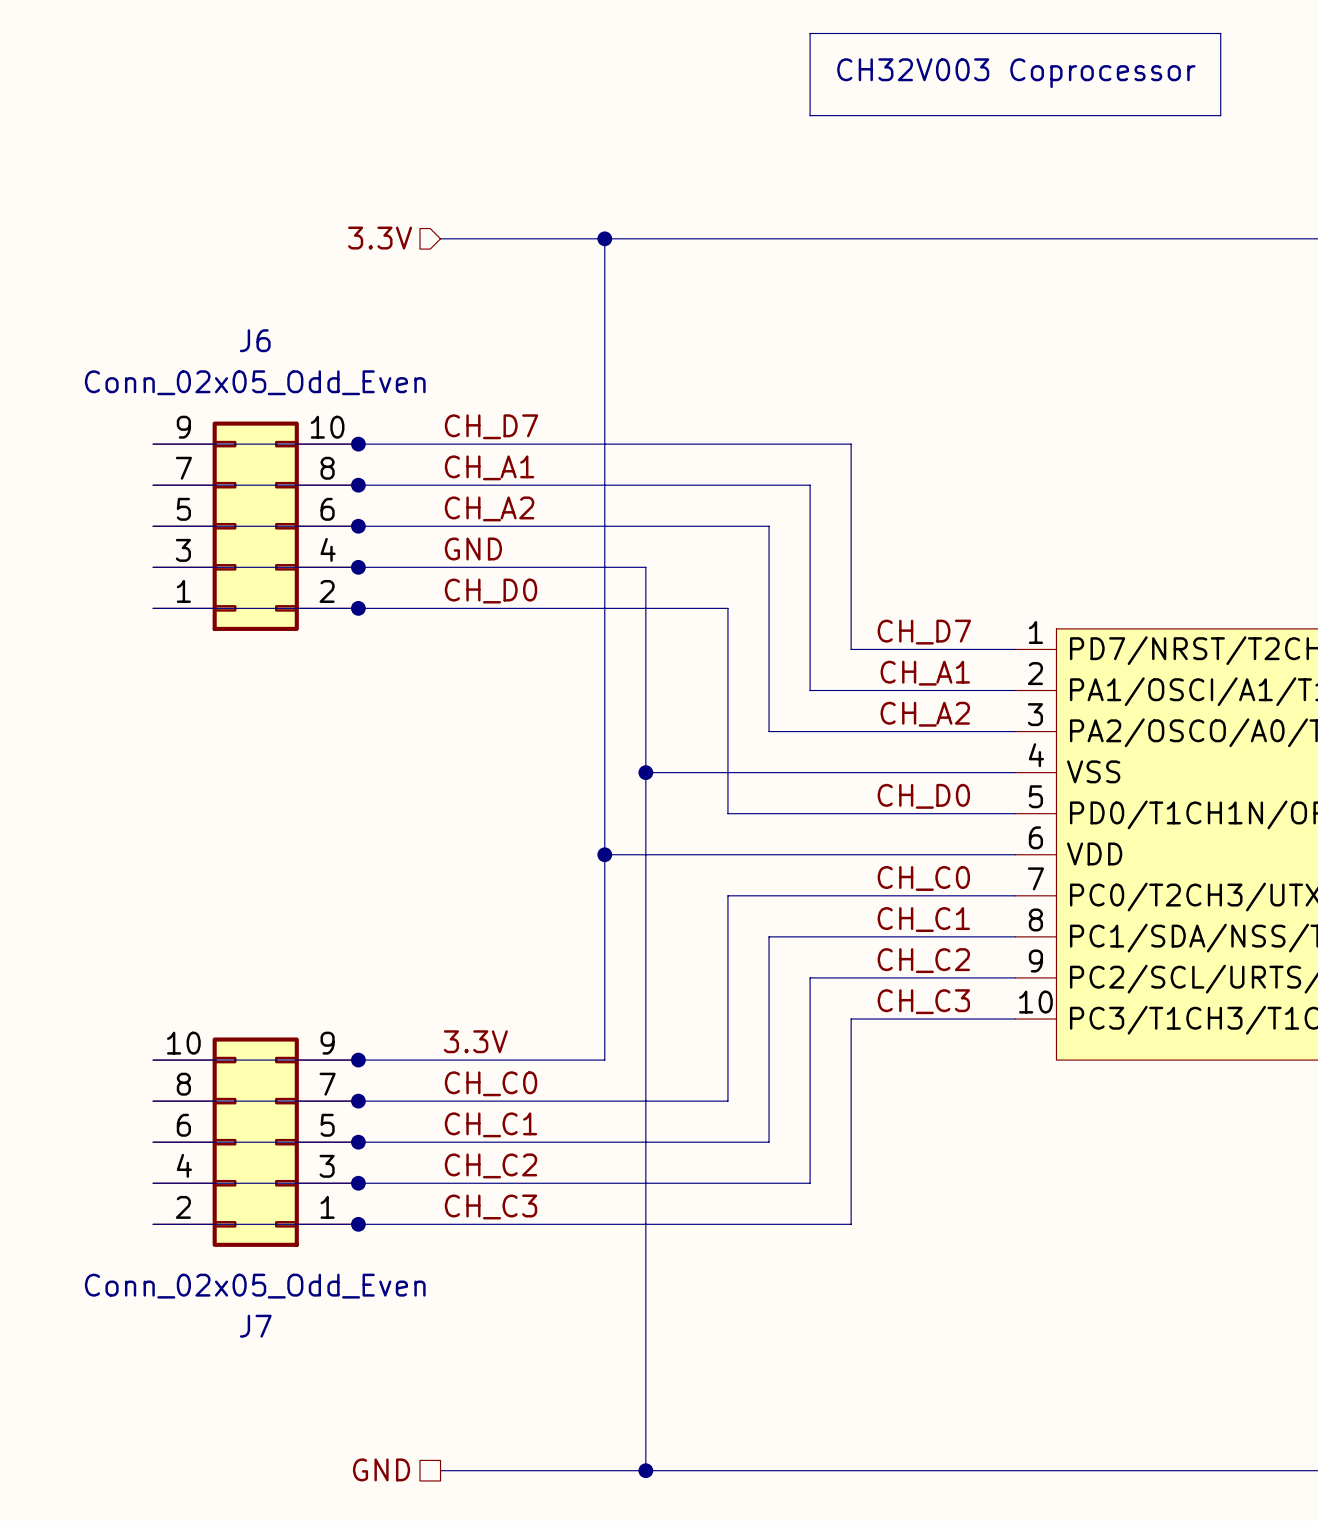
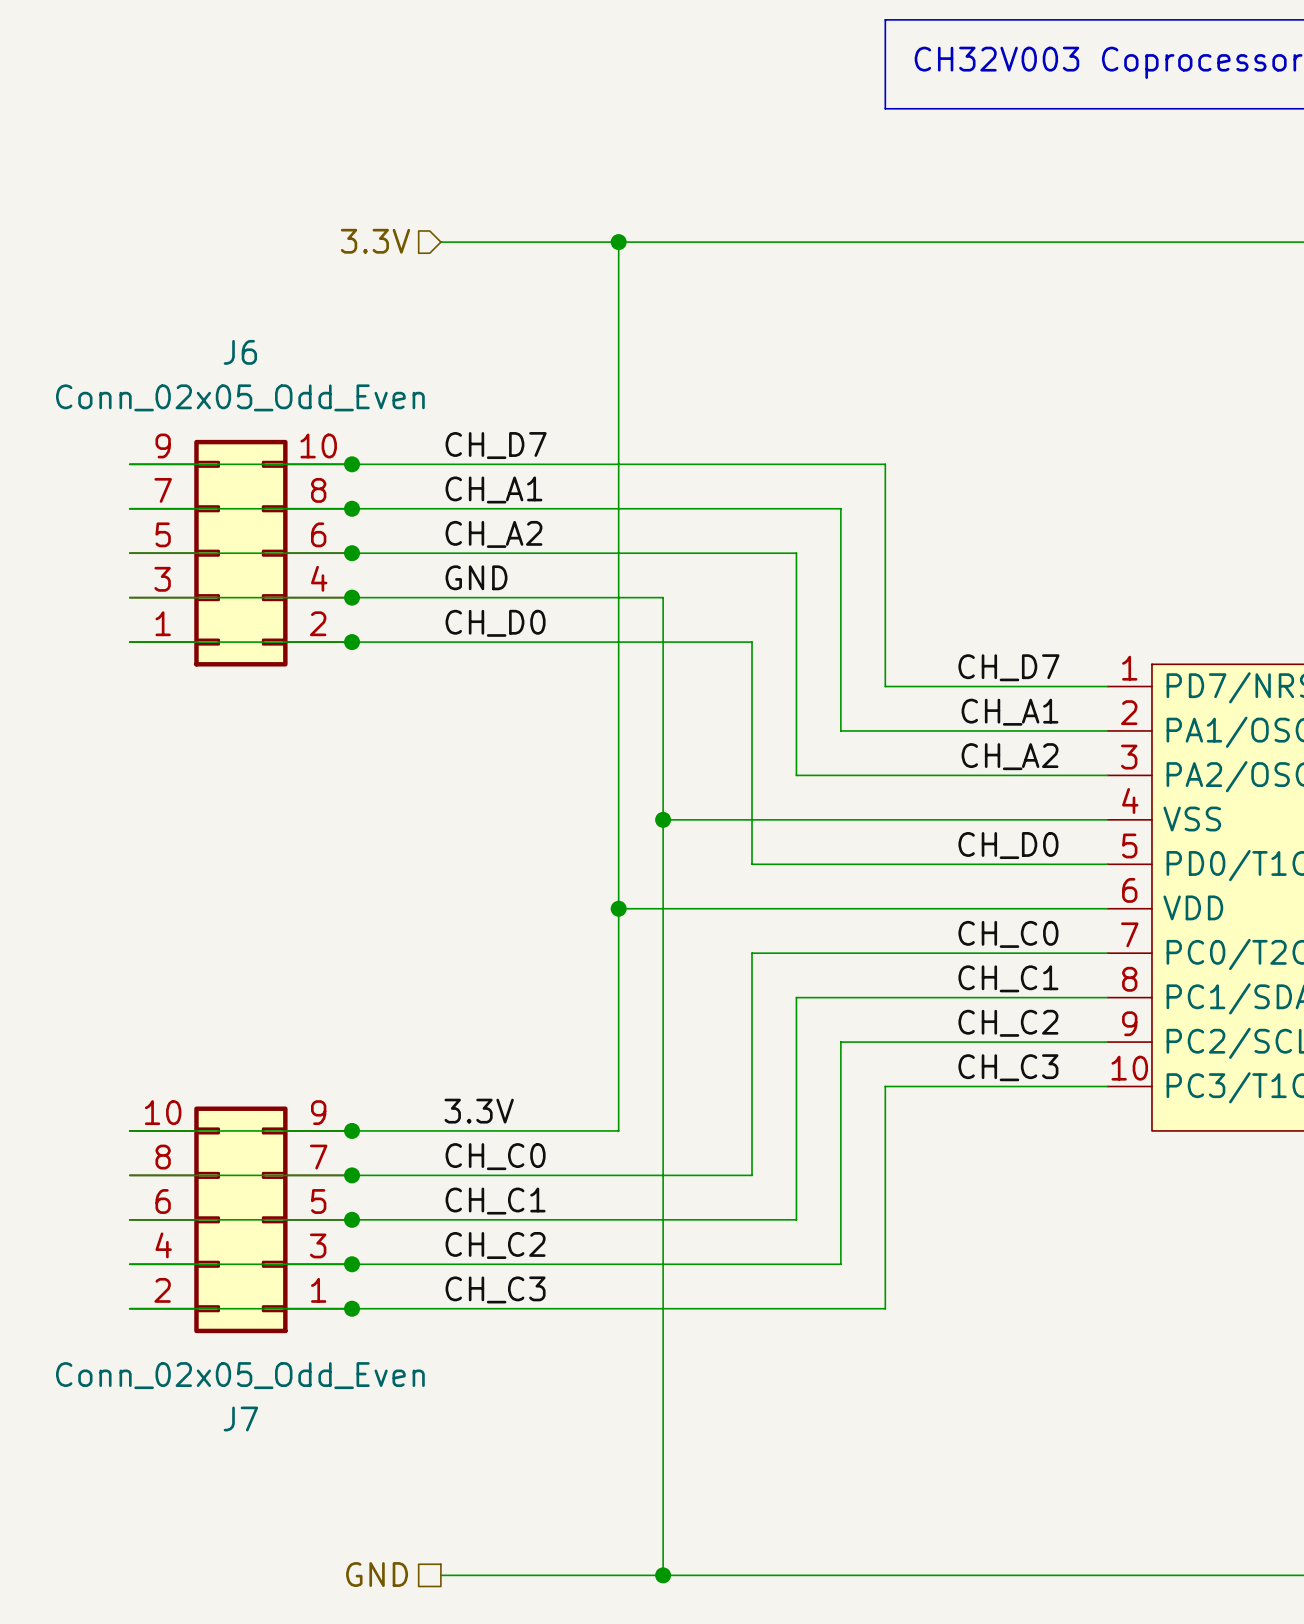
hierarchical label position: 3.3V (380, 238) -> 3.3V (375, 241)
wire: none -> (440, 242) (485, 242)
wire: none -> (618, 242) (618, 1130)
wire: (604, 238) (604, 567) (645, 567) (645, 1470) -> none
junction position: (604, 238) -> (618, 242)
label position: CH_D7 (491, 426) -> CH_D7 (496, 445)
wire: none -> (129, 464) (174, 464)
junction: none -> (352, 464)
junction: (358, 444) -> none
wire: (810, 444) (851, 444) (851, 649) -> (885, 464) (885, 508)
label position: CH_A1 (489, 467) -> CH_A1 (493, 489)
wire: none -> (129, 508) (174, 508)
junction: none -> (352, 508)
junction: (358, 485) -> none
wire: (769, 485) (810, 485) -> (840, 508) (840, 553)
label position: CH_A2 (489, 508) -> CH_A2 (493, 534)
wire: none -> (129, 553) (174, 553)
J6 position: (255, 526) -> (240, 553)
junction: none -> (352, 553)
junction: (358, 526) -> none
wire: (727, 526) (769, 526) -> (796, 553) (796, 642)
label position: GND (473, 548) -> GND (476, 577)
wire: none -> (129, 597) (174, 597)
junction: none -> (352, 597)
junction: (358, 567) -> none
label position: CH_D0 (491, 591) -> CH_D0 (495, 623)
wire: none -> (129, 642) (174, 642)
junction: none -> (352, 642)
junction: (358, 608) -> none
wire: (686, 608) (727, 608) -> (752, 642) (752, 864) (796, 864)
wire: (810, 649) (810, 690) -> (885, 686) (929, 686)
wire: (769, 690) (769, 731) -> (840, 730) (885, 730)
wire: (727, 731) (727, 813) -> (796, 775) (840, 775)
wire: none -> (663, 819) (707, 819)
junction: none -> (663, 819)
junction: (645, 772) -> none
wire: none -> (618, 908) (663, 908)
junction: none -> (618, 908)
junction: (604, 854) -> none
wire: (727, 895) (727, 936) -> (796, 953) (752, 953) (752, 1175)
wire: (769, 936) (769, 977) -> (840, 997) (796, 997)
wire: (810, 977) (810, 1019) -> (885, 1042) (840, 1042)
wire: (851, 1019) (851, 1224) (810, 1224) -> (929, 1086) (885, 1086)
label position: 3.3V (475, 1041) -> 3.3V (479, 1111)
wire: none -> (129, 1130) (174, 1130)
junction: none -> (352, 1130)
junction: (358, 1060) -> none
wire: (563, 1060) (604, 1060) -> (663, 1575) (663, 1130)
label position: CH_C0 (491, 1083) -> CH_C0 (495, 1156)
wire: none -> (129, 1175) (174, 1175)
junction: none -> (352, 1175)
junction: (358, 1101) -> none
wire: (686, 1101) (727, 1101) -> (796, 1219) (796, 1175)
label position: CH_C1 (491, 1124) -> CH_C1 (495, 1201)
wire: none -> (129, 1219) (174, 1219)
J7 position: (255, 1142) -> (240, 1219)
junction: none -> (352, 1219)
junction: (358, 1142) -> none
wire: (727, 1142) (769, 1142) -> (840, 1264) (840, 1219)
label position: CH_C2 (491, 1165) -> CH_C2 (495, 1245)
wire: none -> (129, 1264) (174, 1264)
junction: none -> (352, 1264)
junction: (358, 1183) -> none
wire: (769, 1183) (810, 1183) -> (885, 1308) (885, 1264)
label position: CH_C3 (491, 1206) -> CH_C3 (495, 1289)
wire: none -> (129, 1308) (174, 1308)
junction: none -> (352, 1308)
junction: (358, 1224) -> none
hierarchical label position: GND (381, 1469) -> GND (377, 1574)
wire: none -> (440, 1575) (485, 1575)
junction position: (645, 1470) -> (663, 1575)

